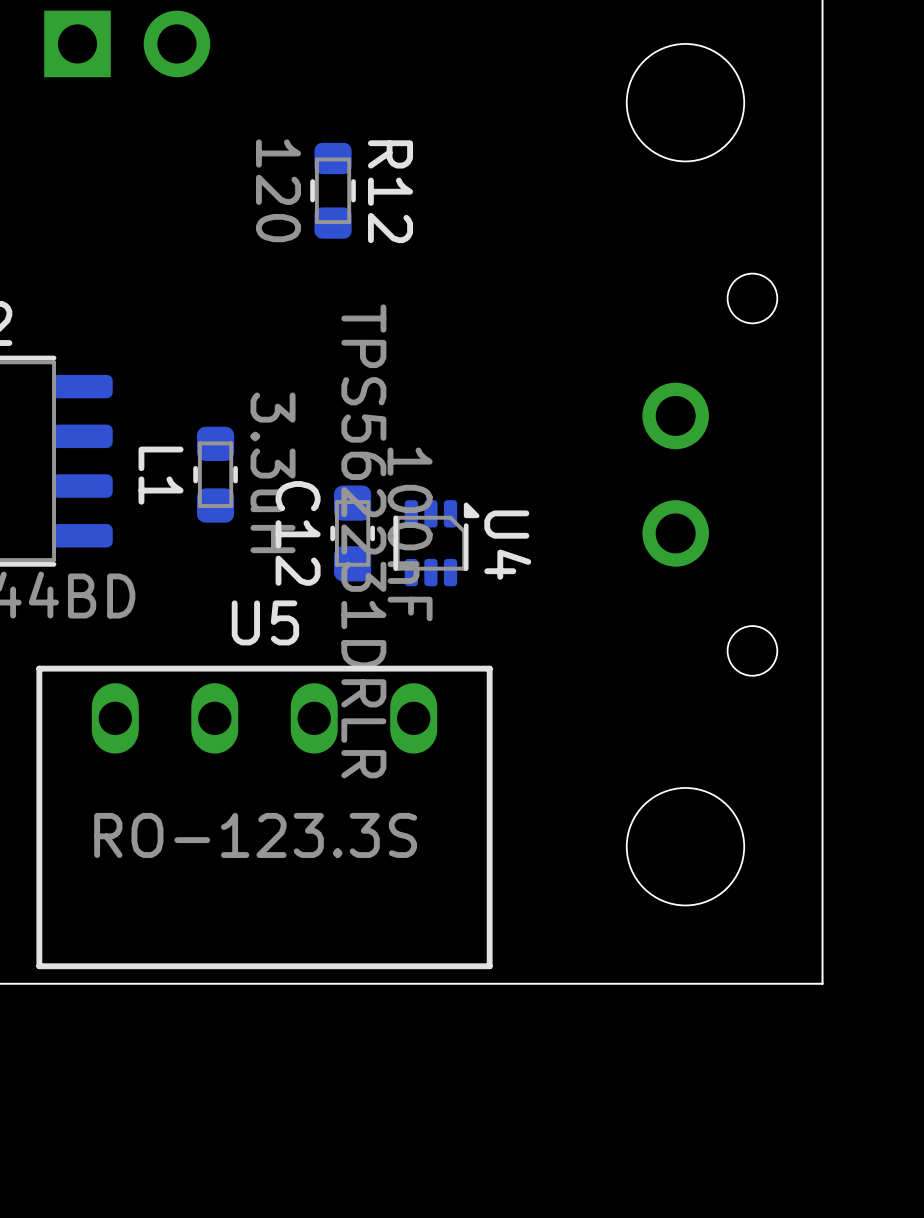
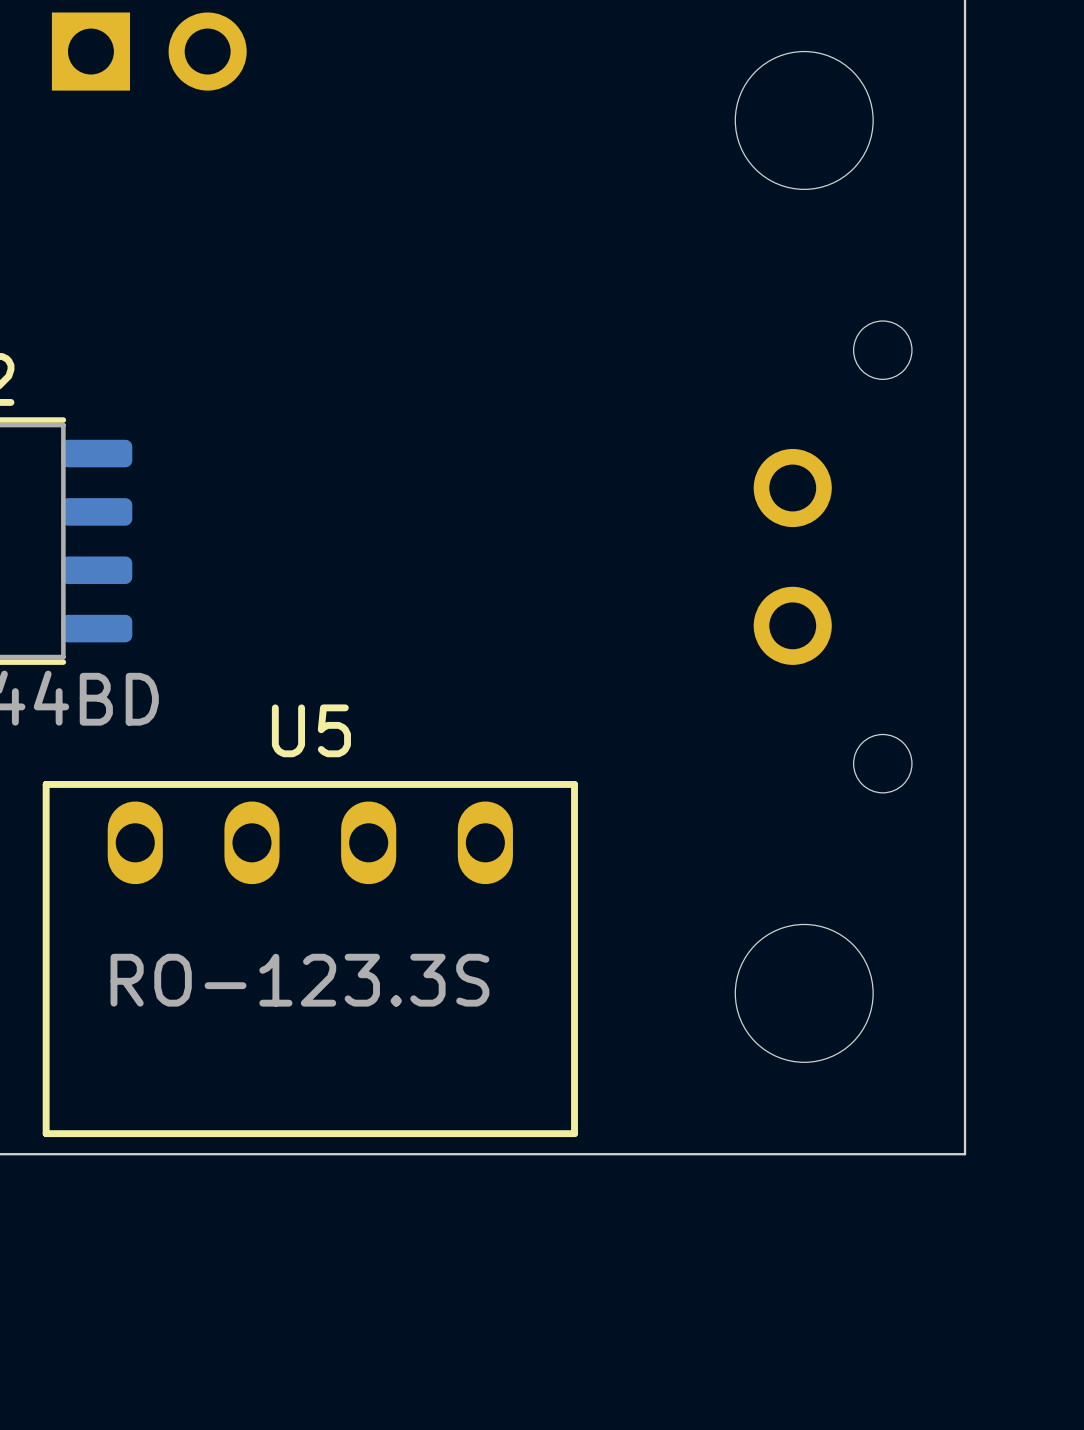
R12: 120 (333, 190) -> none
L1: 3.3uH (215, 474) -> none
C12: 100nF (352, 533) -> none
U4: TPS562231DRLR (436, 543) -> none

